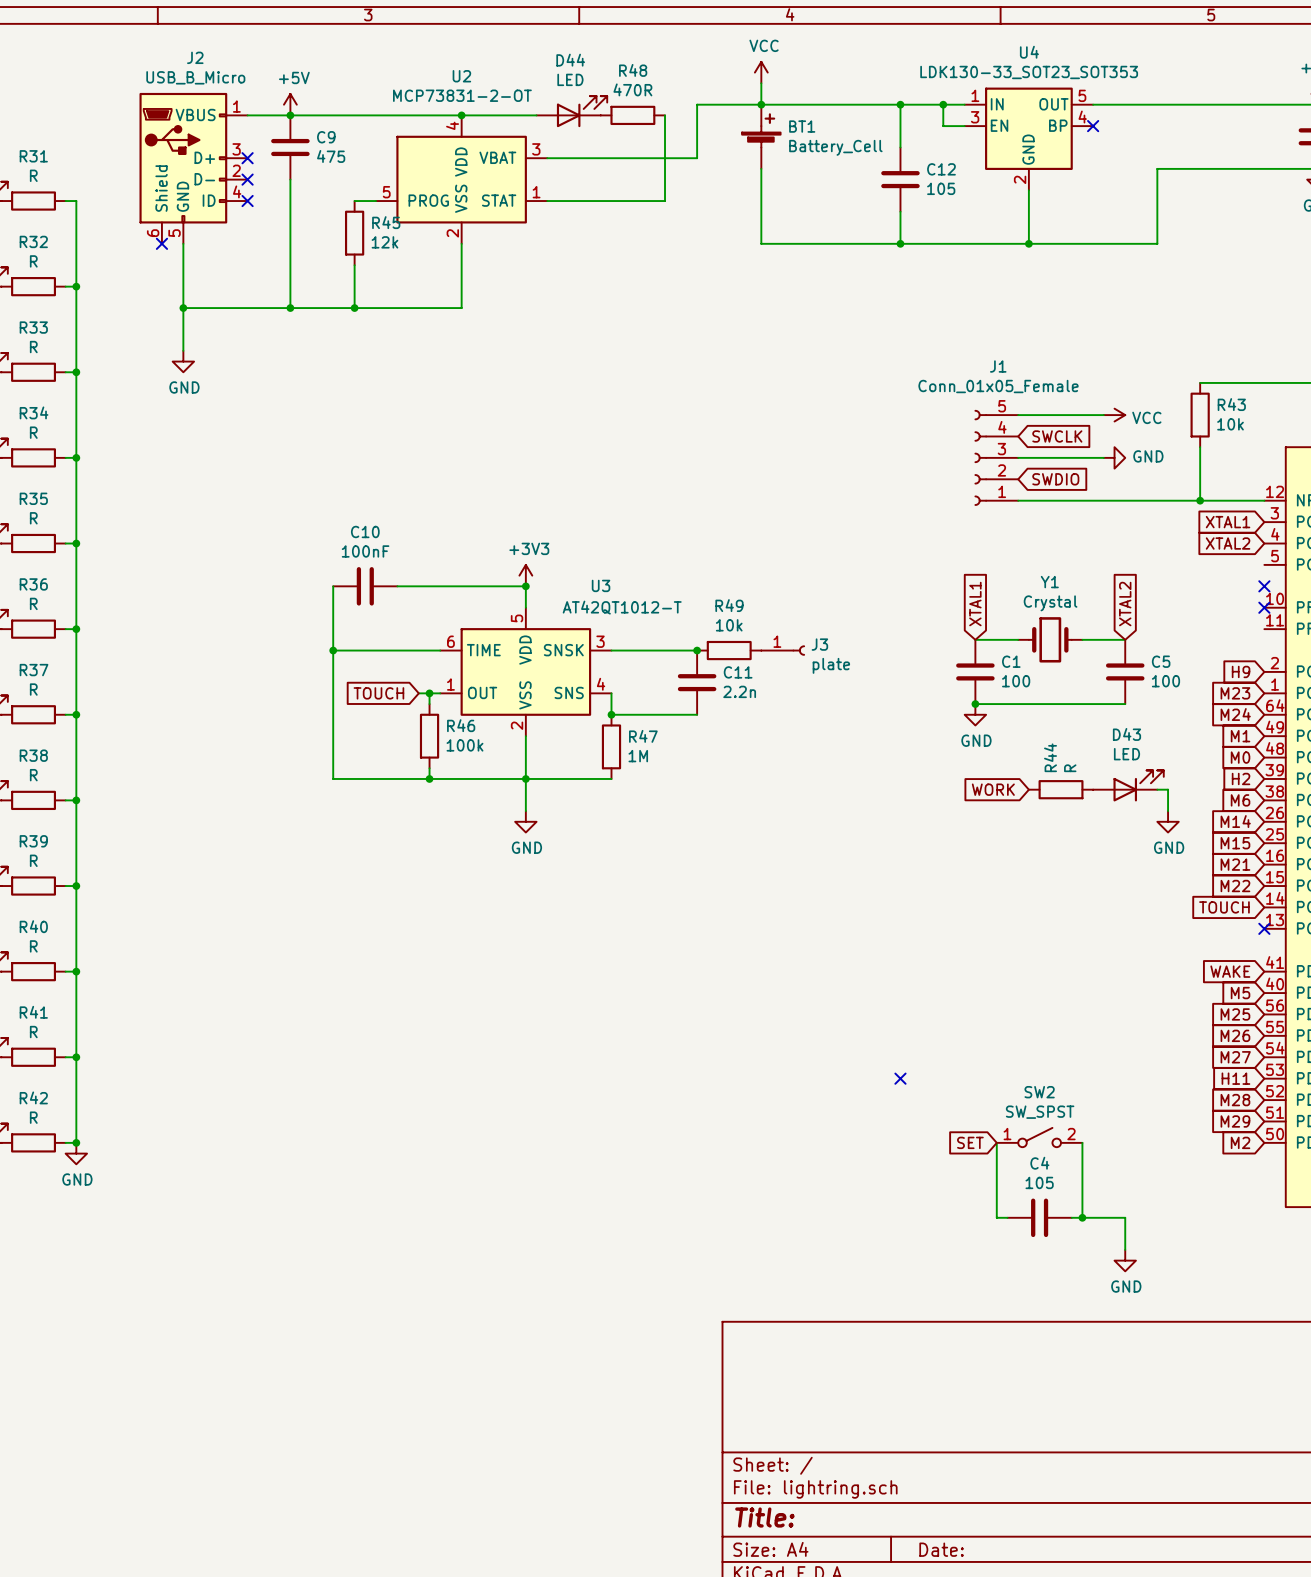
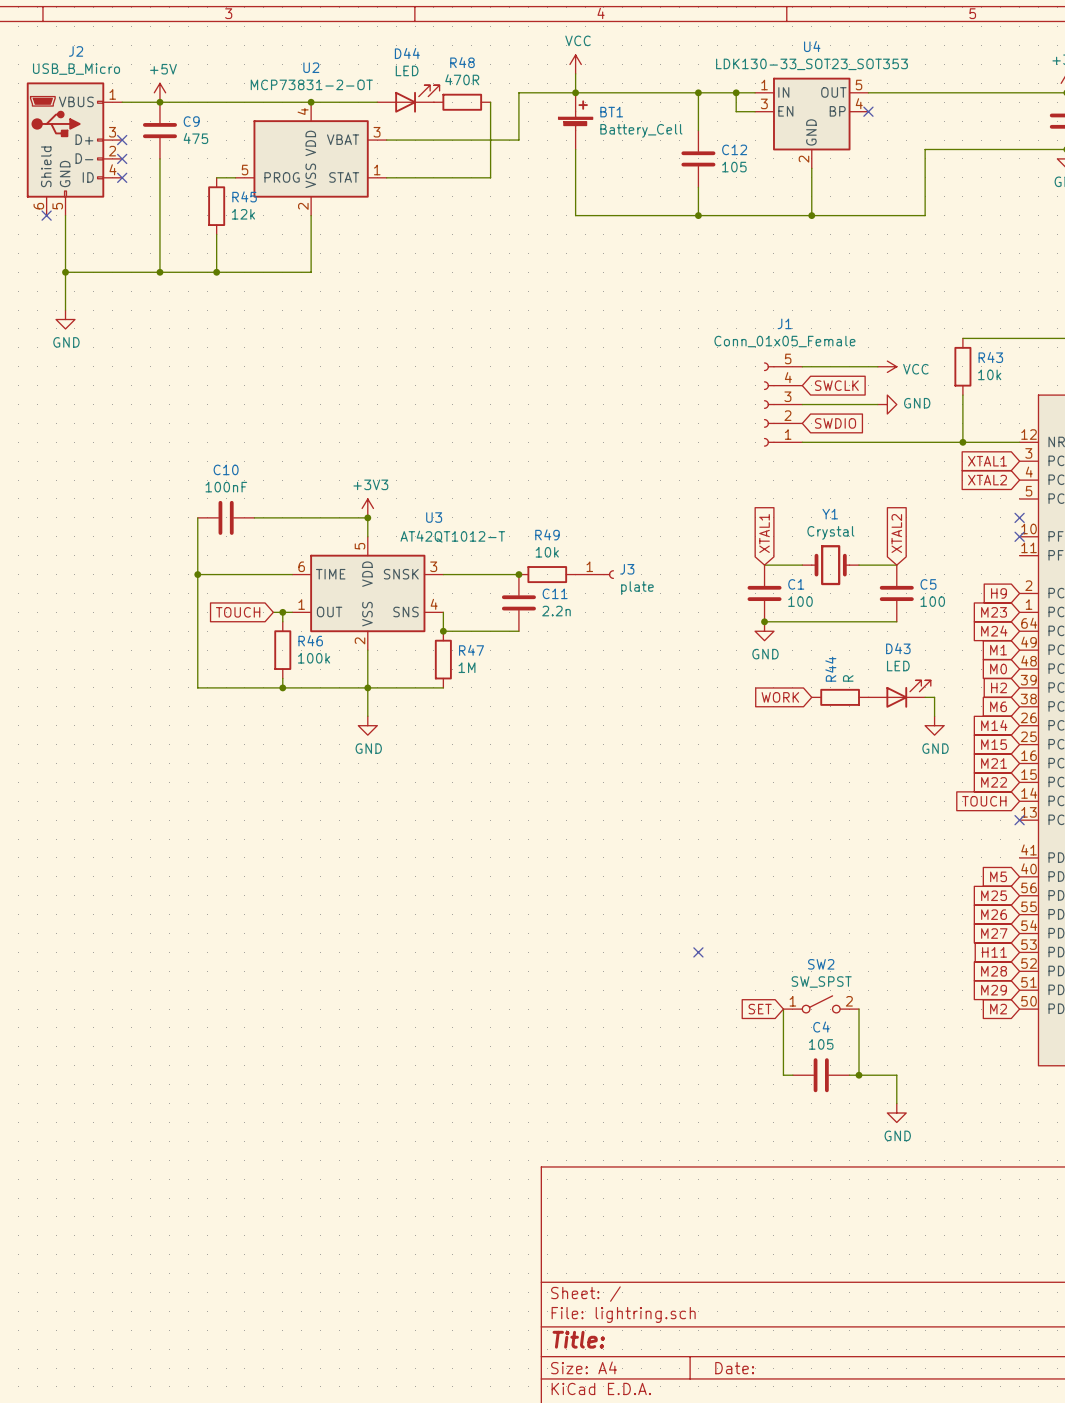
global label: WAKE (1230, 971) -> none

